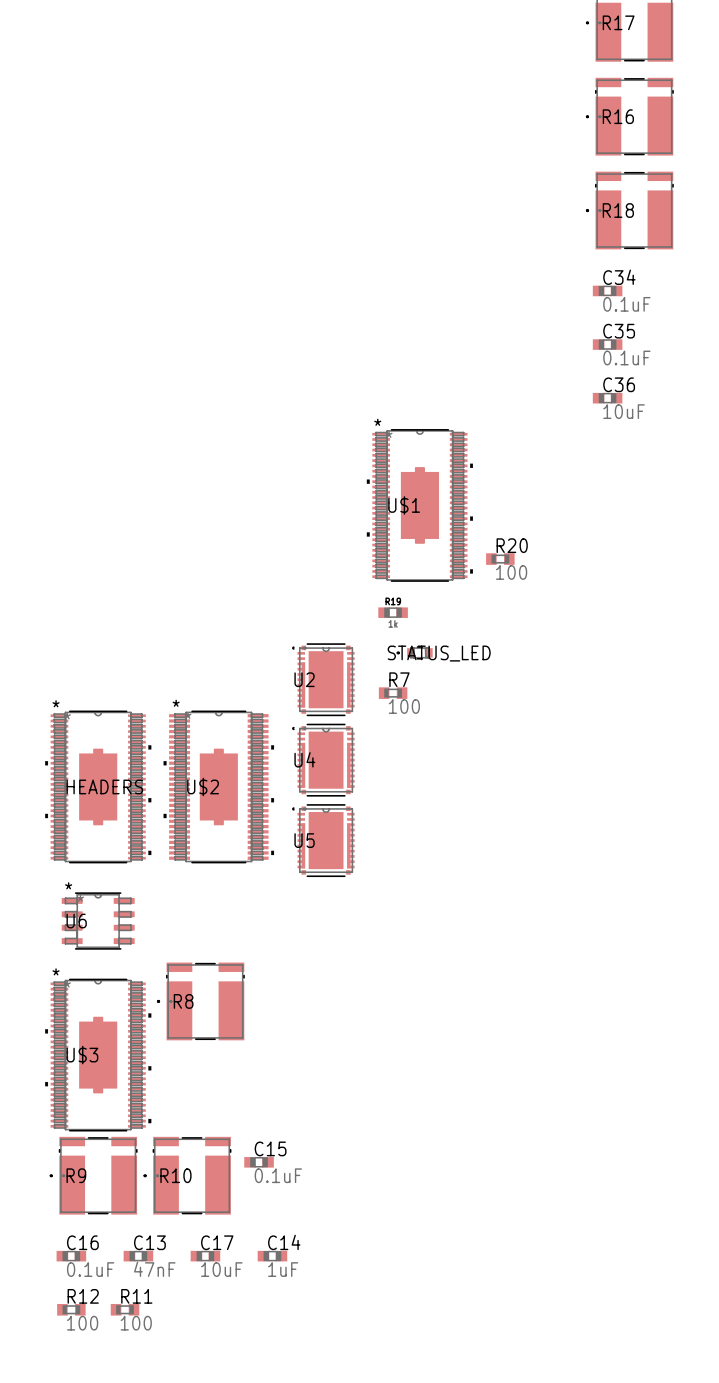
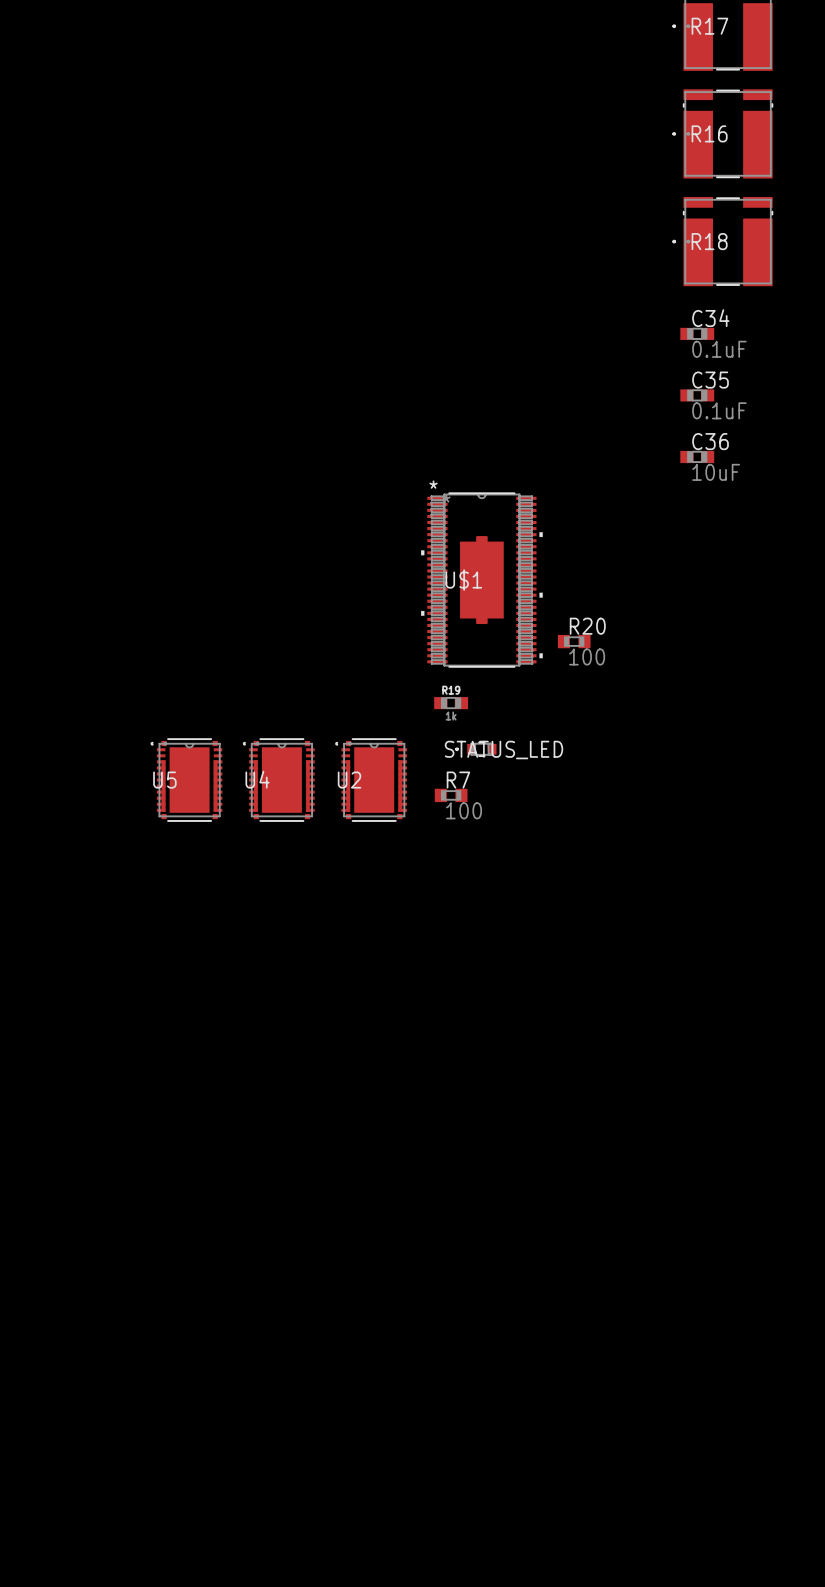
U4 position: (323, 760) -> (278, 780)
HEADERS: (98, 786) -> none
U$2: (218, 786) -> none
U5 position: (323, 840) -> (186, 780)
U6: (98, 921) -> none
R8: (200, 1001) -> none
U$3: (98, 1055) -> none
C15: 0.1uF (259, 1162) -> none
R9: (93, 1175) -> none
R10: (187, 1175) -> none
C16: 0.1uF (71, 1256) -> none
C13: 47nF (138, 1256) -> none
C17: 10uF (205, 1256) -> none
C14: 1uF (272, 1256) -> none
R12: 100 (71, 1309) -> none
R11: 100 (125, 1309) -> none

